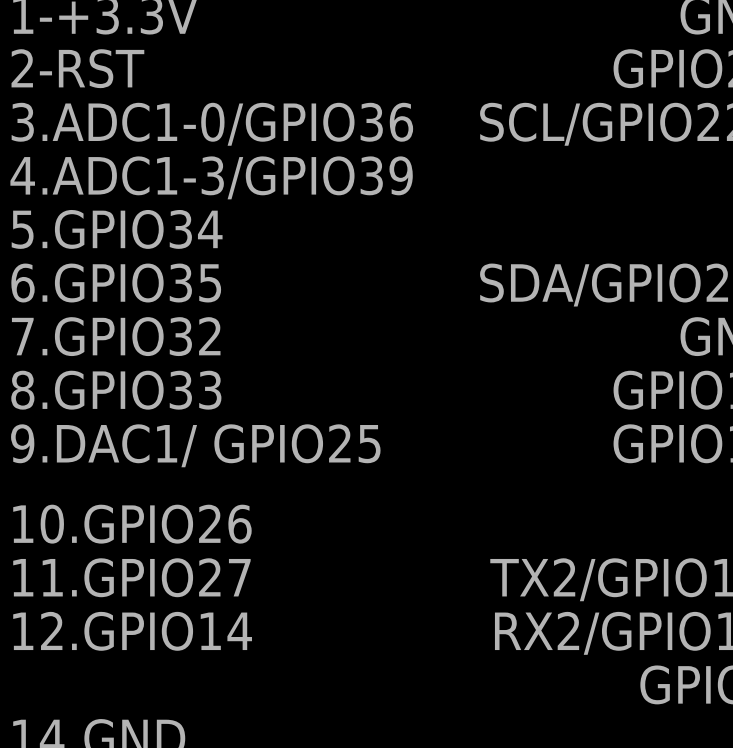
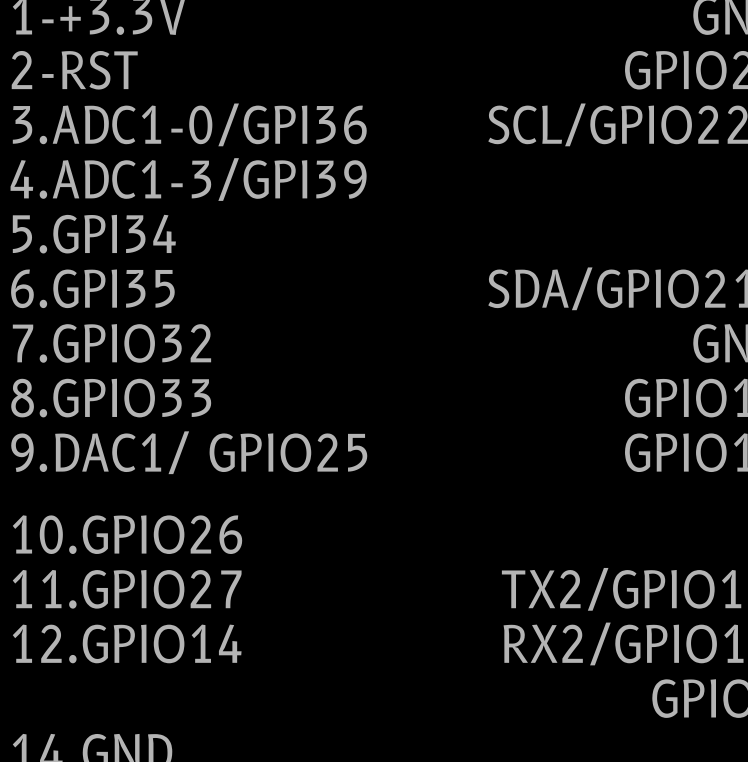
text: 3.ADC1-0/GPIO36 (212, 124) -> 3.ADC1-0/GPI36 (189, 124)
text: 4.ADC1-3/GPIO39 (211, 177) -> 4.ADC1-3/GPI39 (188, 179)
text: 5.GPIO34 (117, 229) -> 5.GPI34 (94, 234)
text: 6.GPIO35 (116, 283) -> 6.GPI35 (92, 288)

